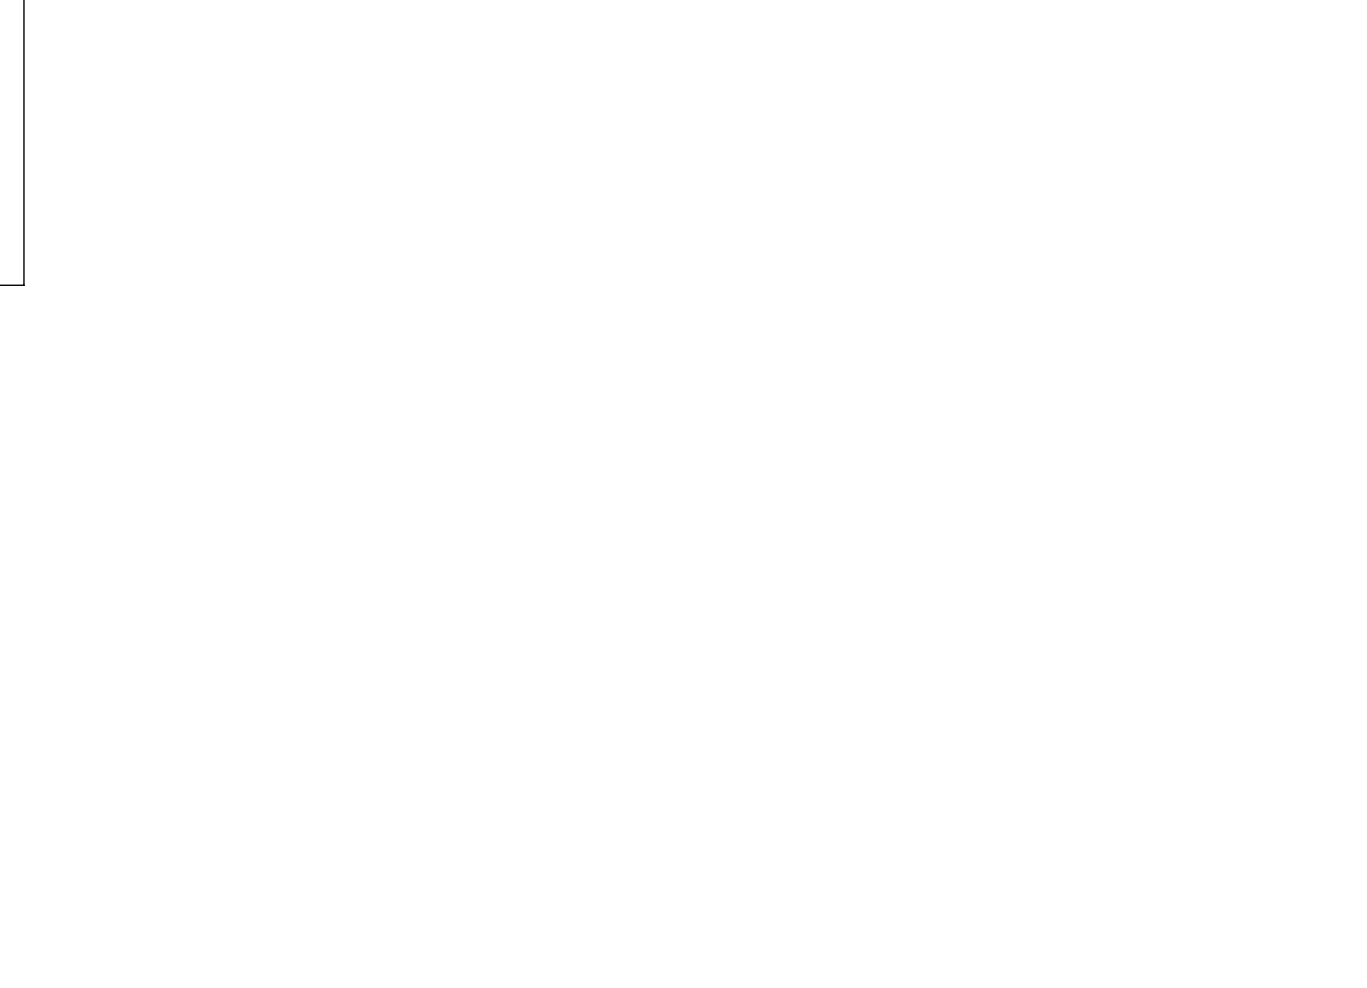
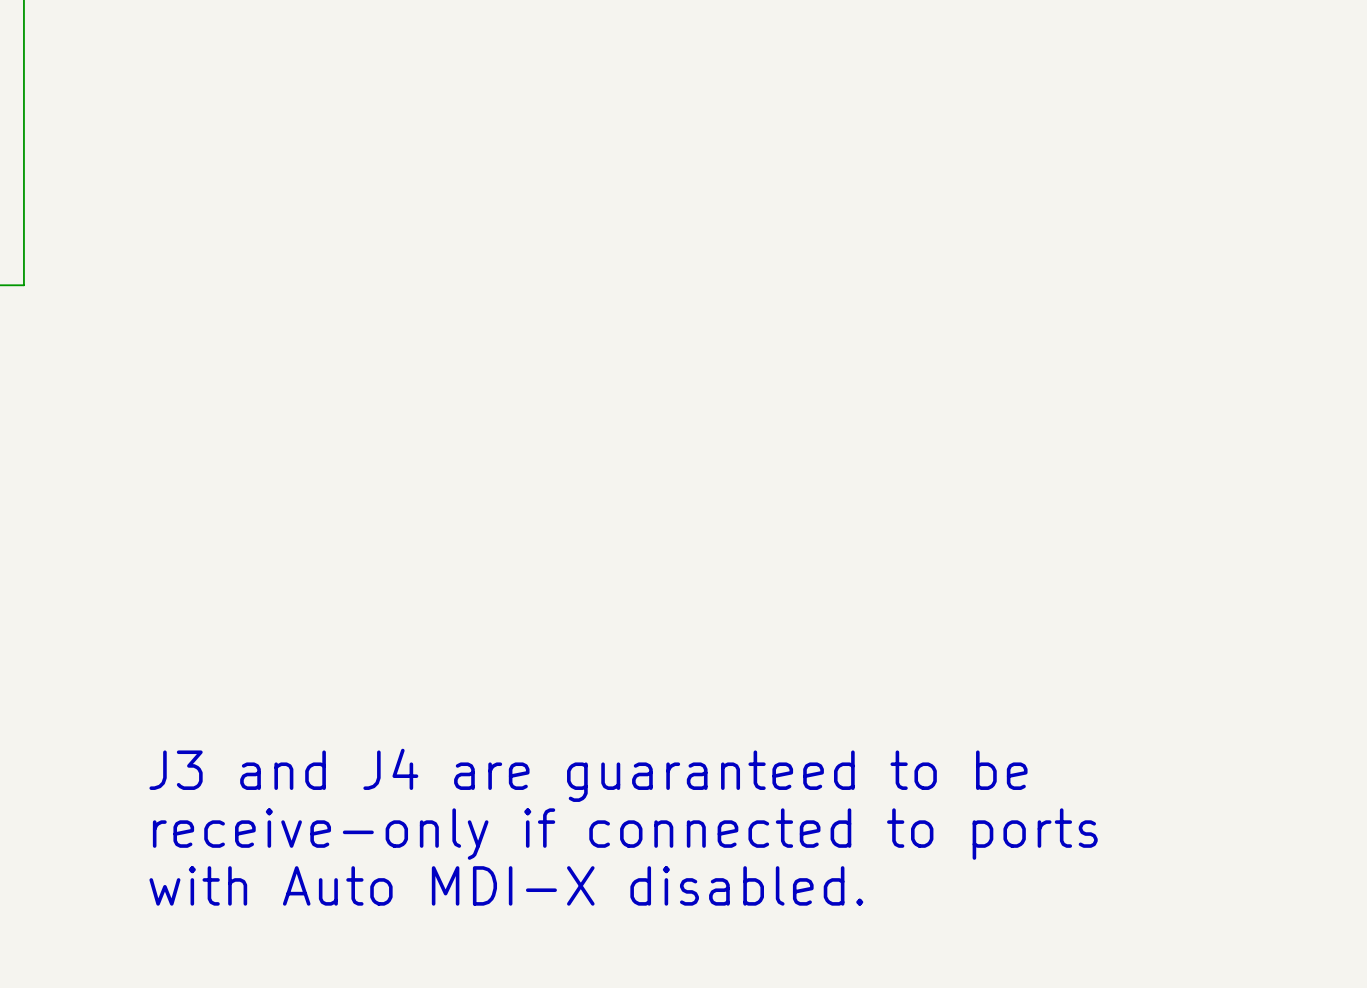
text: none -> J3 and J4 are guaranteed to be (588, 775)
text: none -> receive-only if connected to ports (625, 834)
text: none -> with Auto MDI-X disabled. (506, 885)

